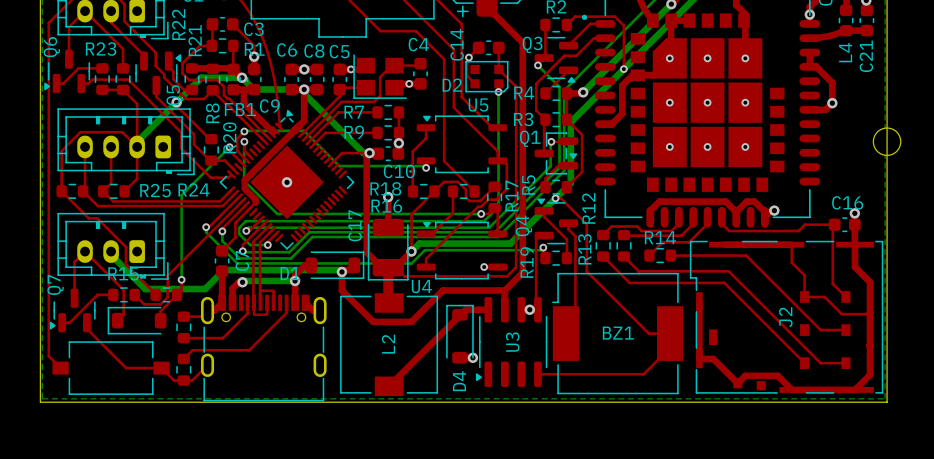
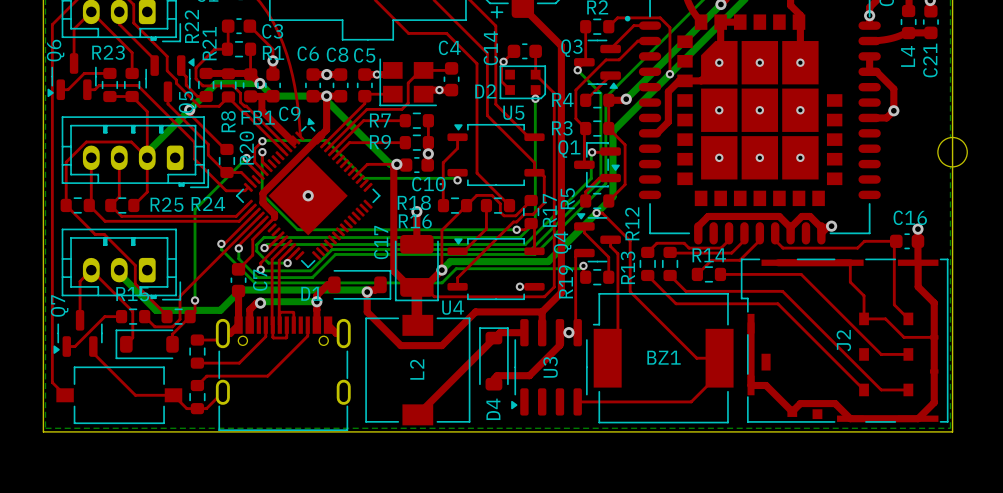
top track: none -> (559, 332) (559, 345) (529, 375) (497, 375) (494, 378)
via: (472, 357) -> none

